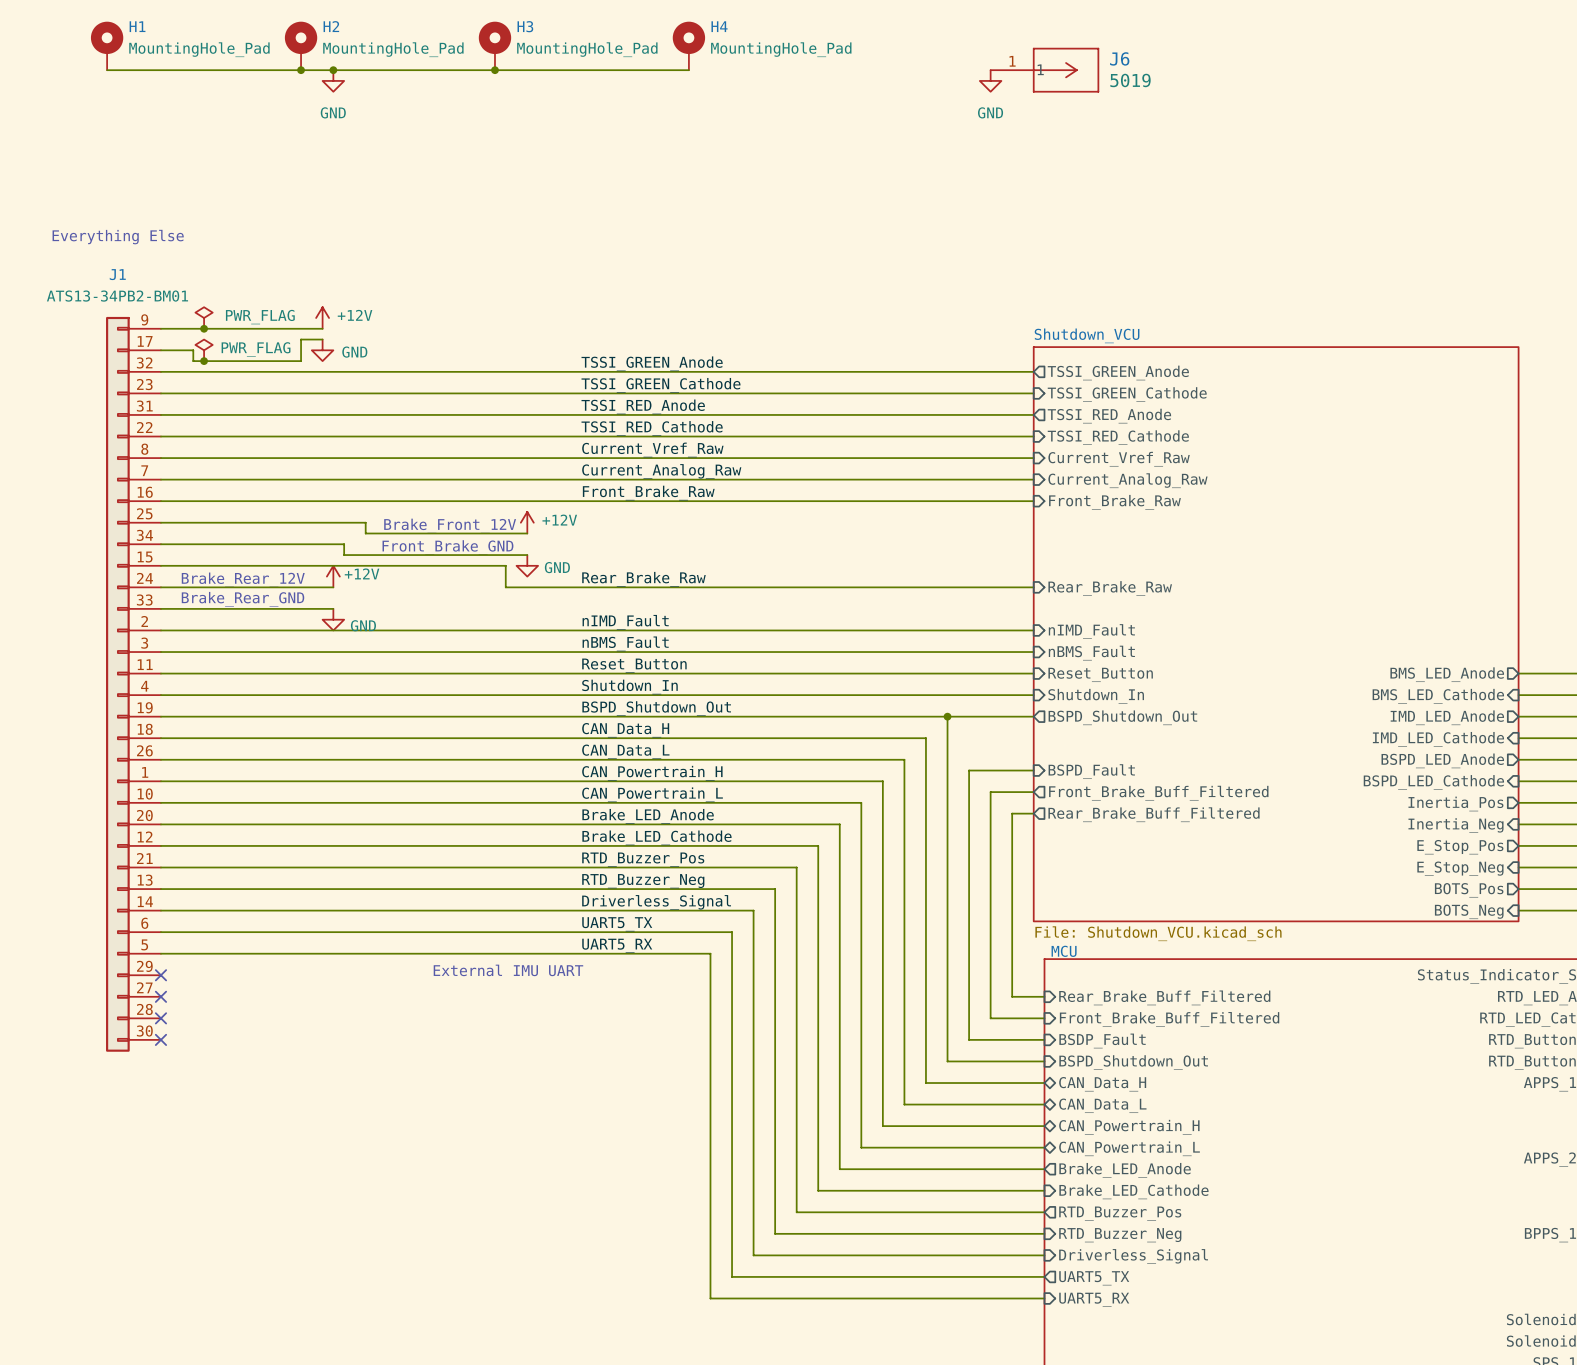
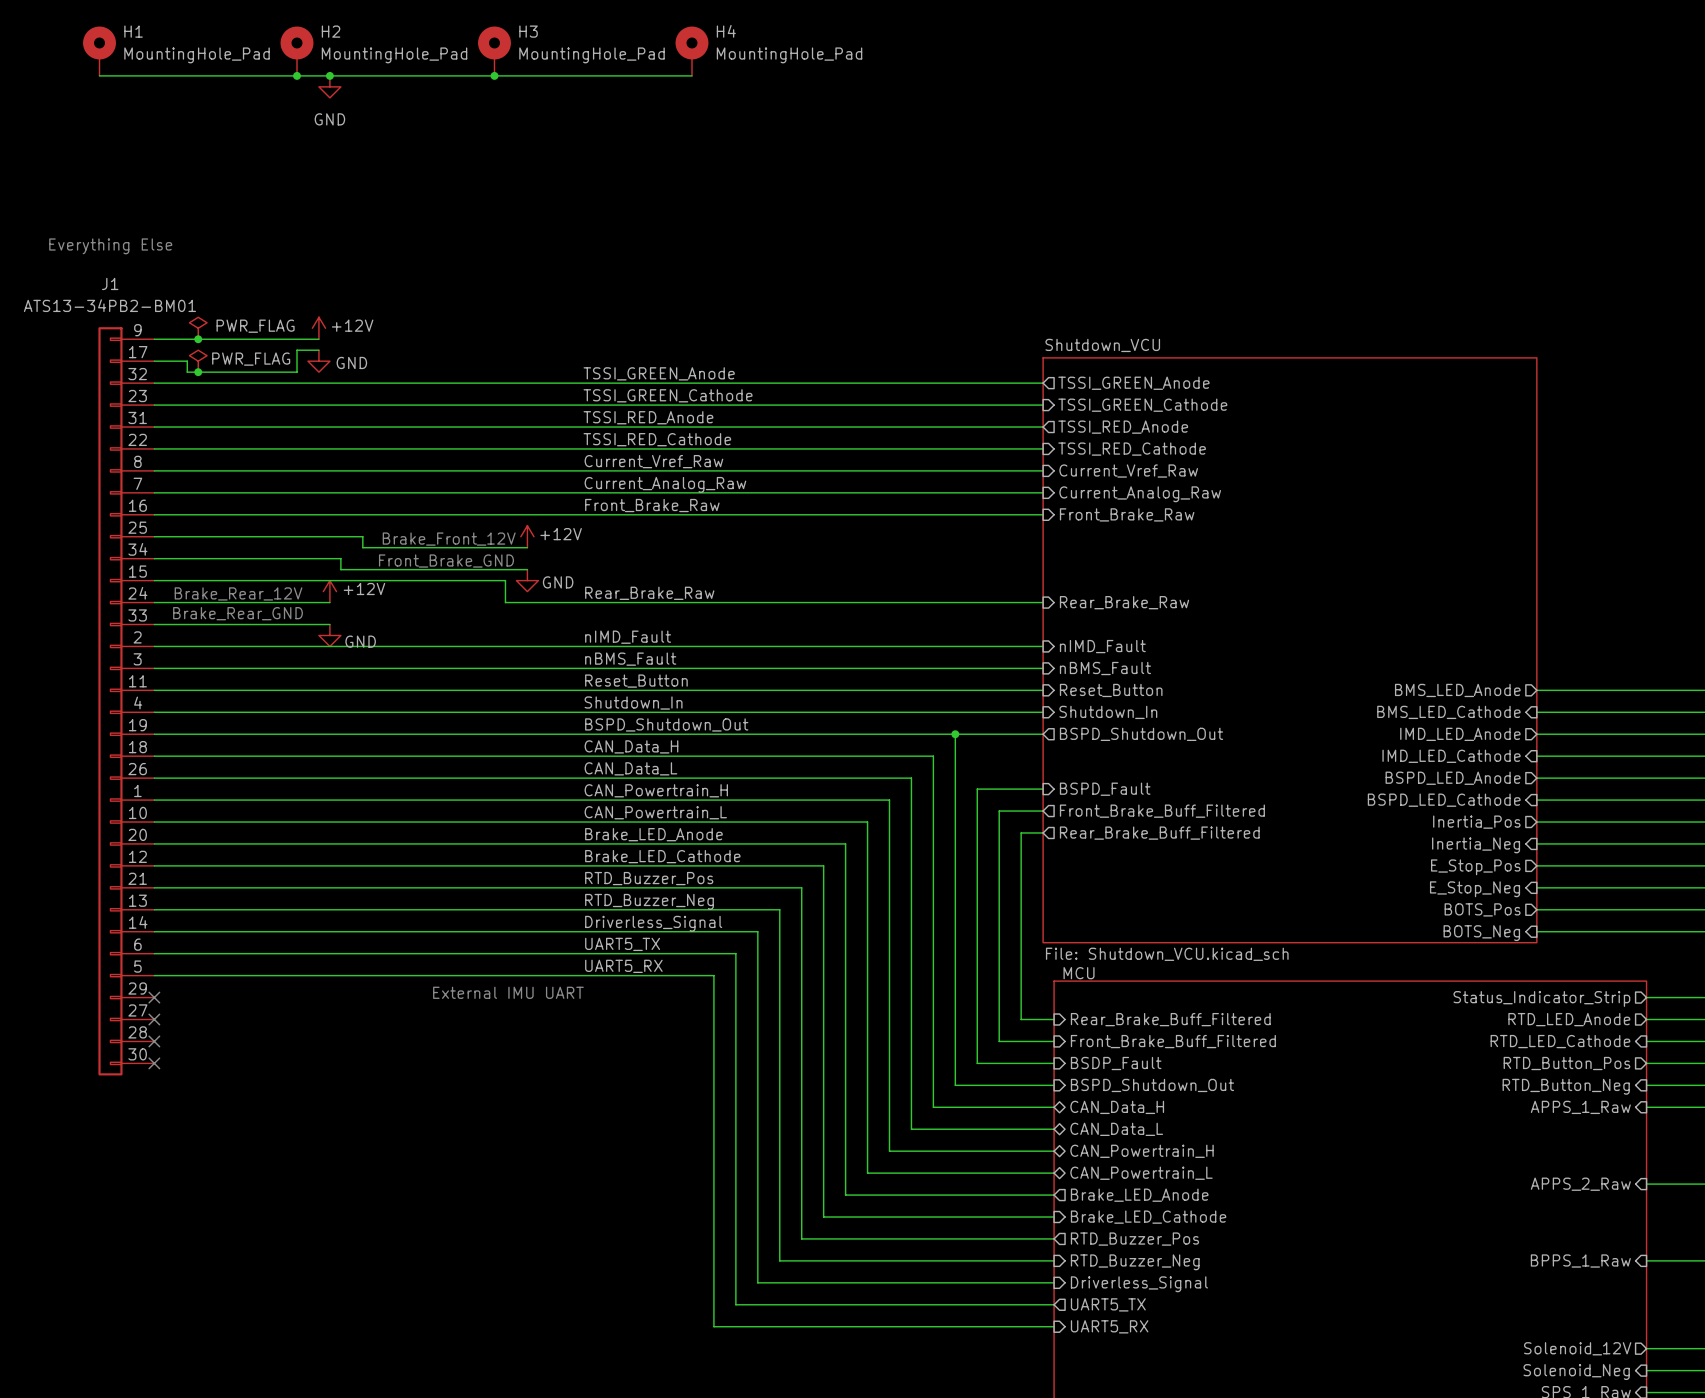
J6: 5019 (1044, 70) -> none
power symbol: GND (990, 80) -> none

